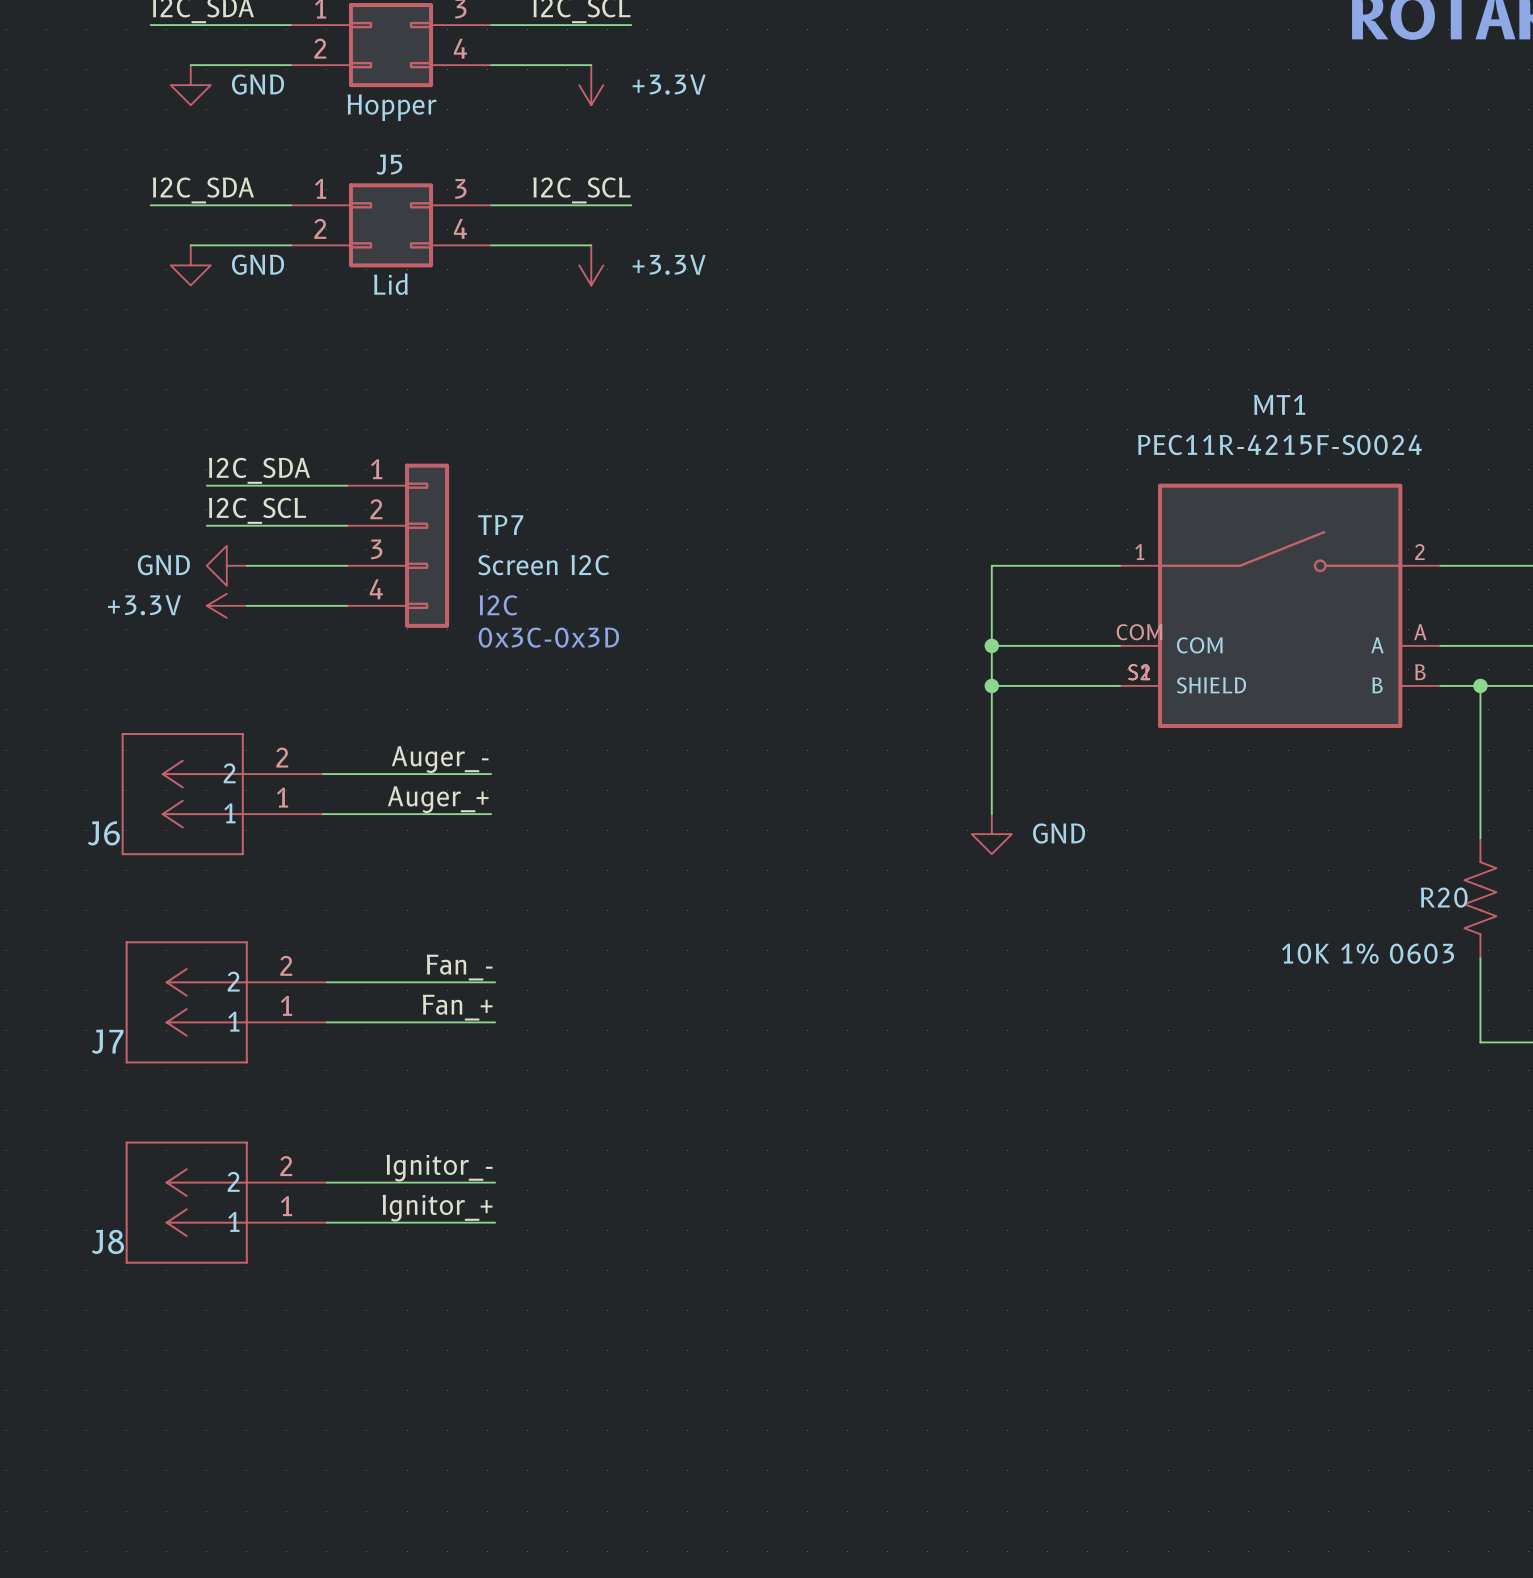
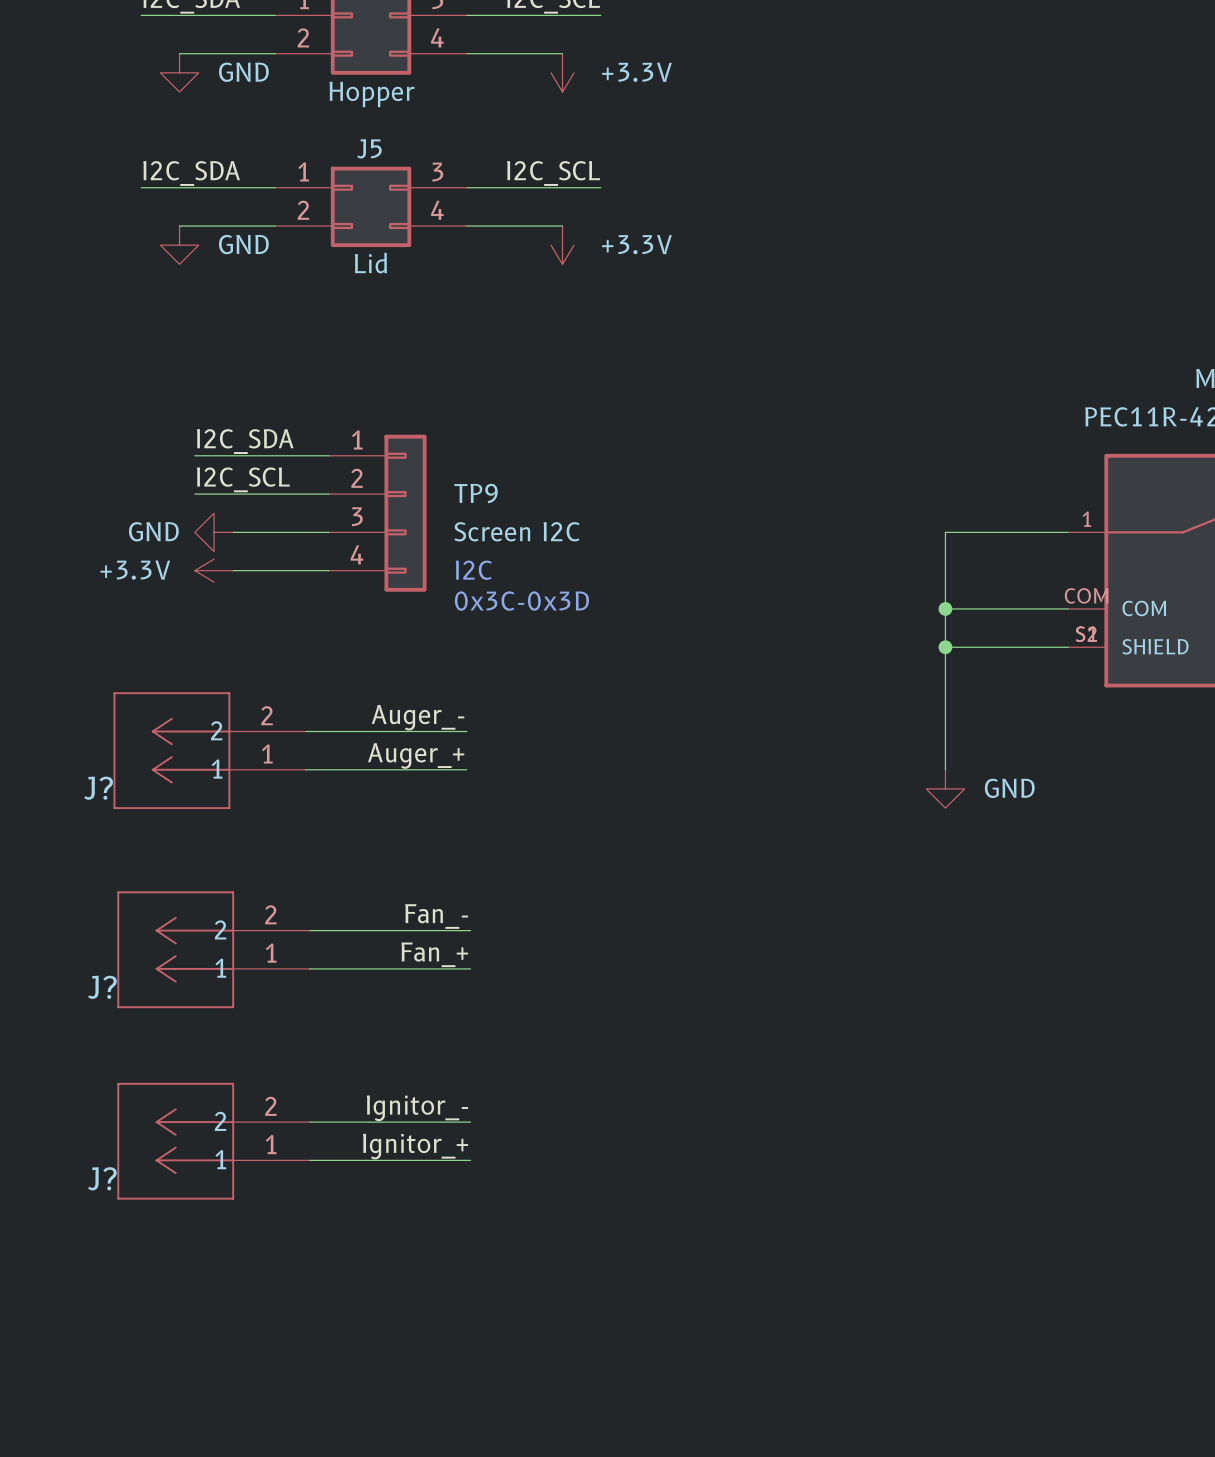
TP7 name: TP7 (500, 525) -> TP9 (476, 493)
J6 name: J6 (103, 833) -> J? (98, 788)
J7 name: J7 (107, 1041) -> J? (102, 987)
J8 name: J8 (107, 1241) -> J? (102, 1178)

